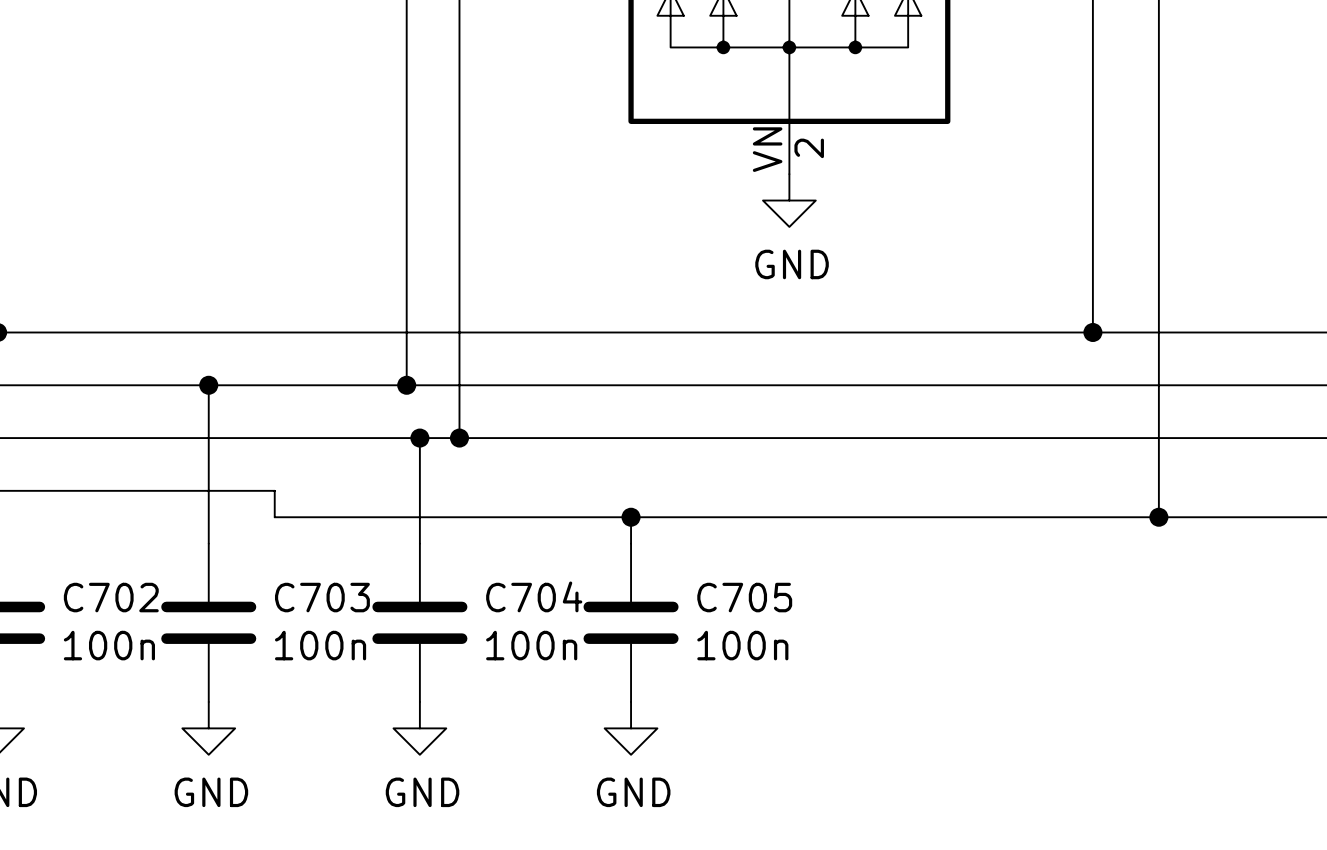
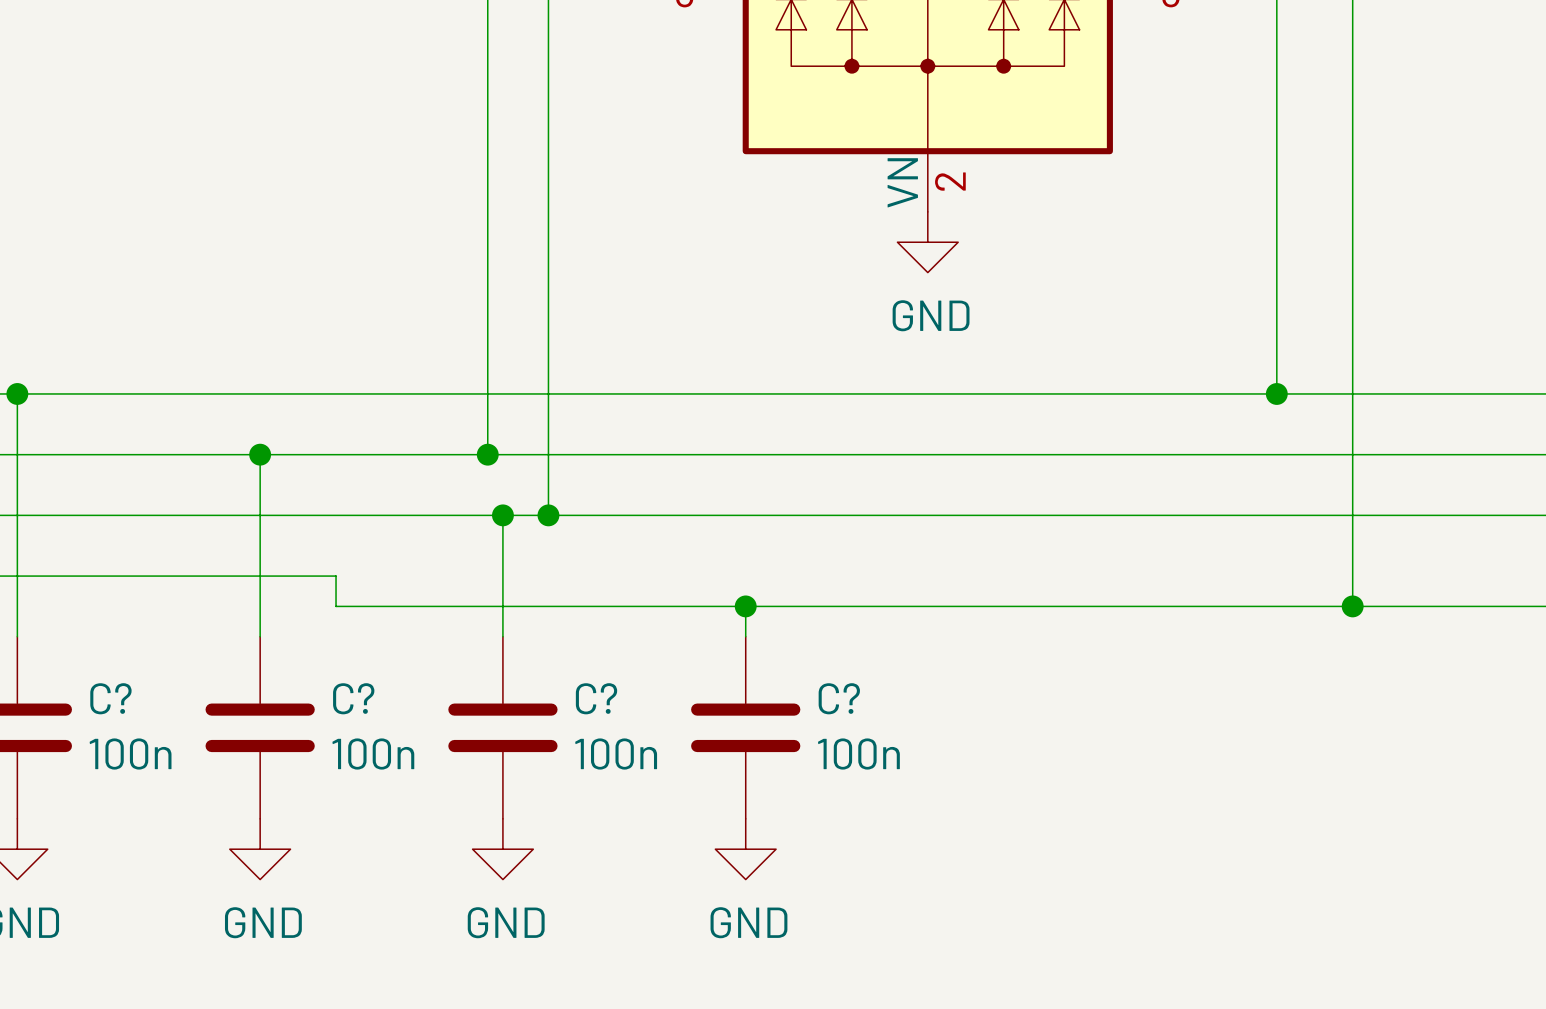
C704 name: C704 (534, 596) -> C? (596, 698)
C702 name: C702 (111, 597) -> C? (110, 698)
C703 name: C703 (322, 597) -> C? (353, 698)
C705 name: C705 (744, 597) -> C? (839, 698)

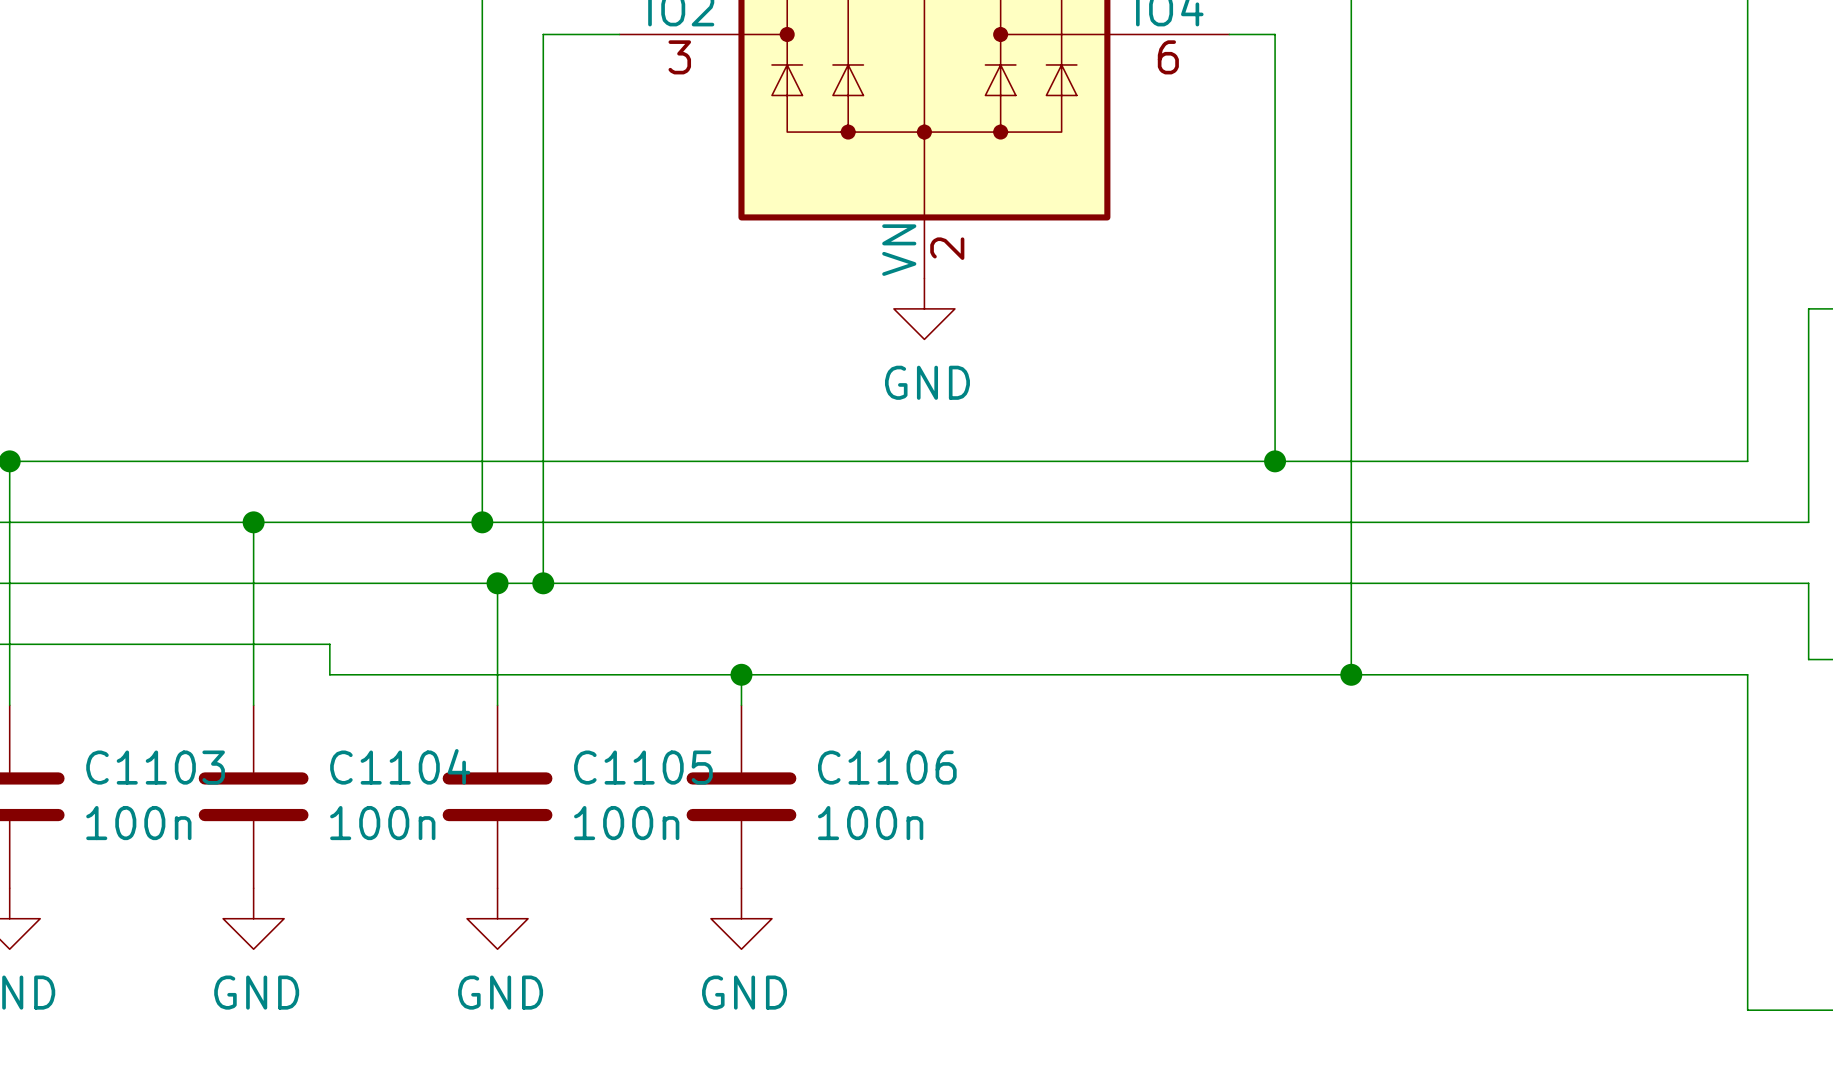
C? name: C? (110, 698) -> C1103 (155, 767)
C? name: C? (353, 698) -> C1104 (400, 766)
C? name: C? (596, 698) -> C1105 (643, 767)
C? name: C? (839, 698) -> C1106 (887, 767)

